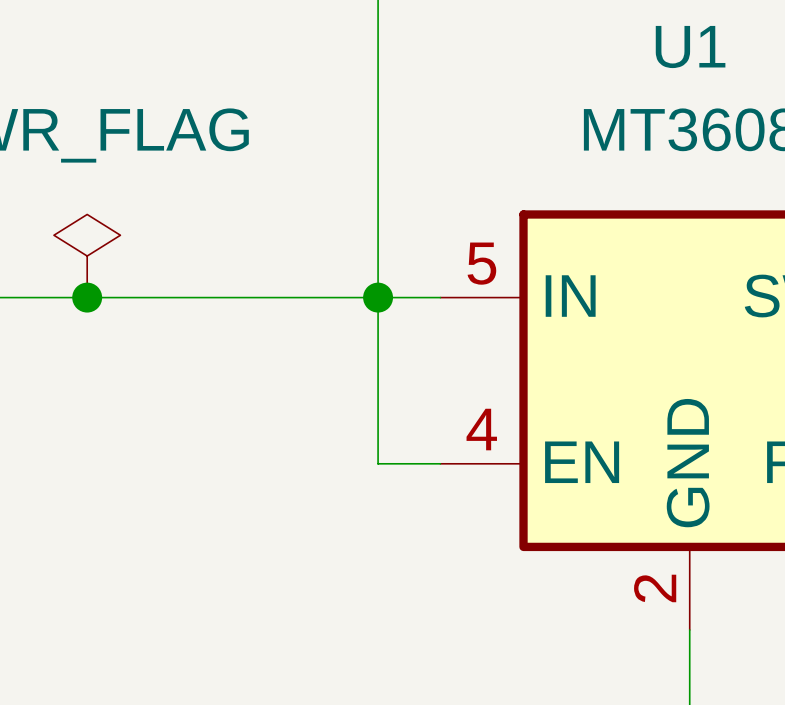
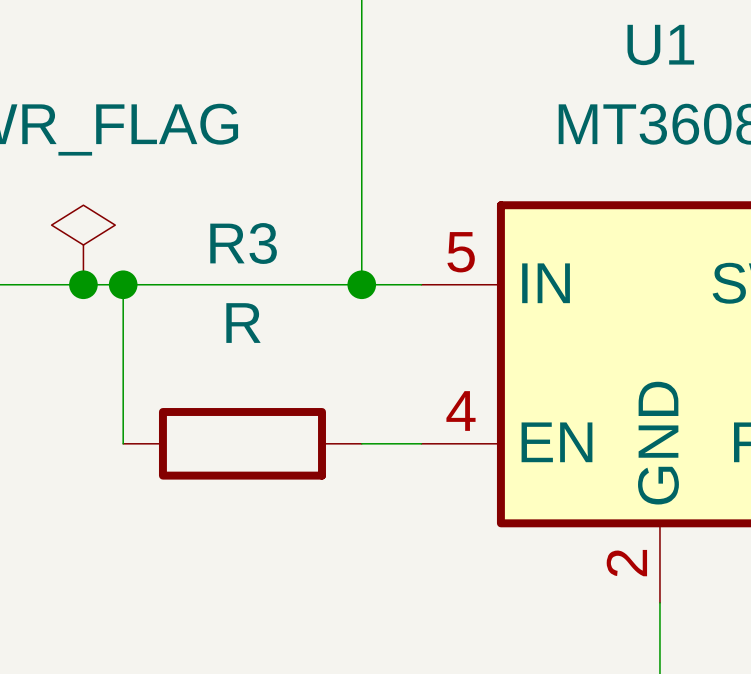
junction: none -> (123, 284)
wire: (378, 297) (378, 463) -> (123, 284) (123, 443)
R3: none -> R (242, 443)

